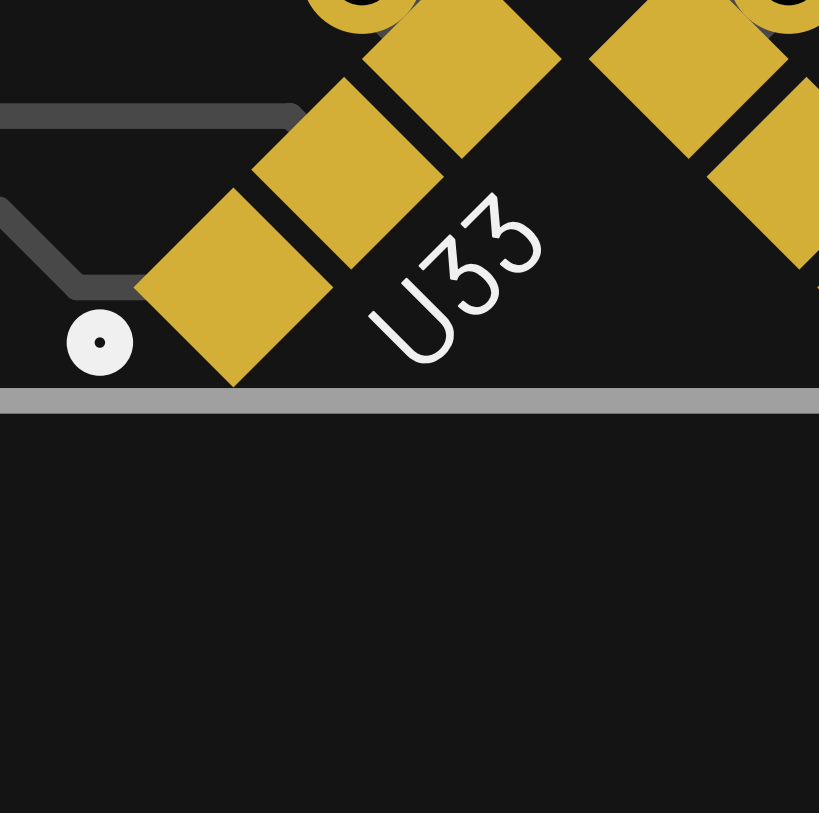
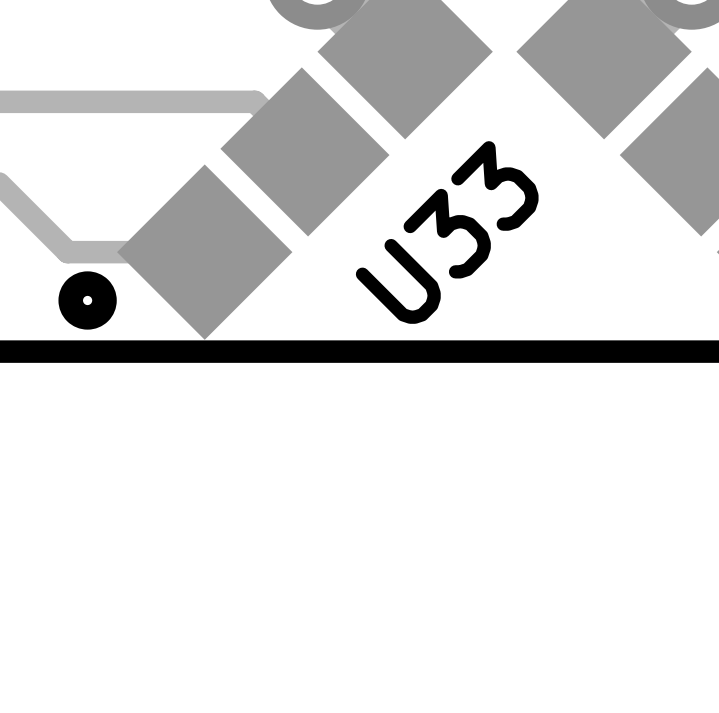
U33 name position: U33 (454, 278) -> U33 (447, 232)

